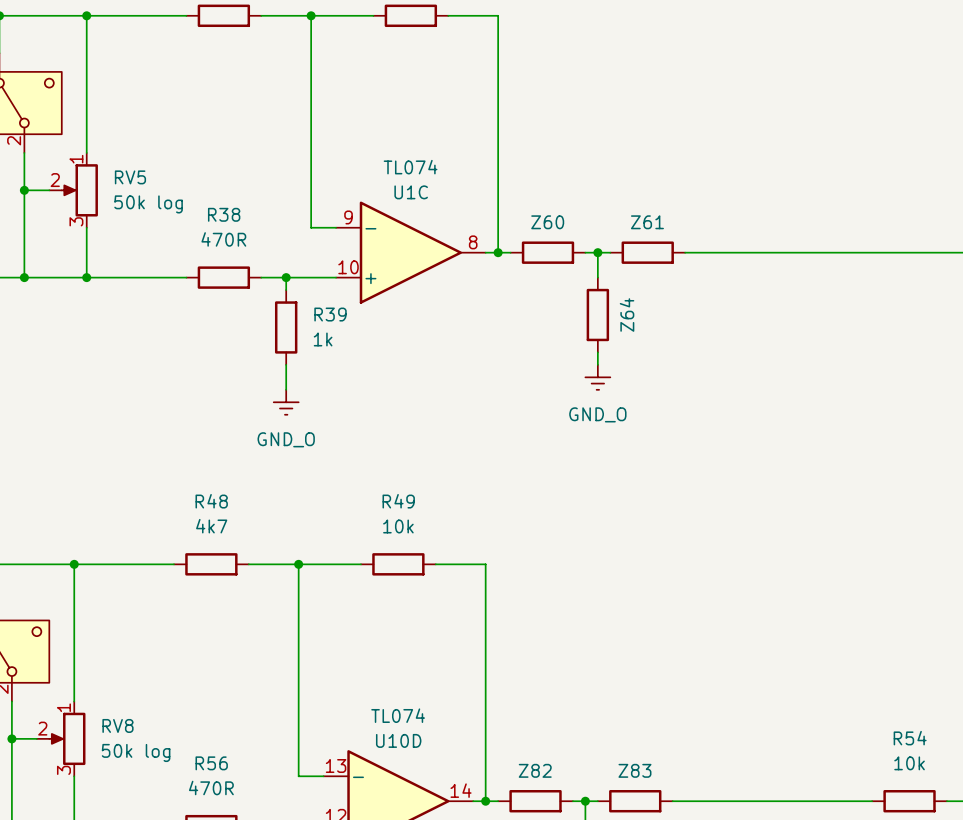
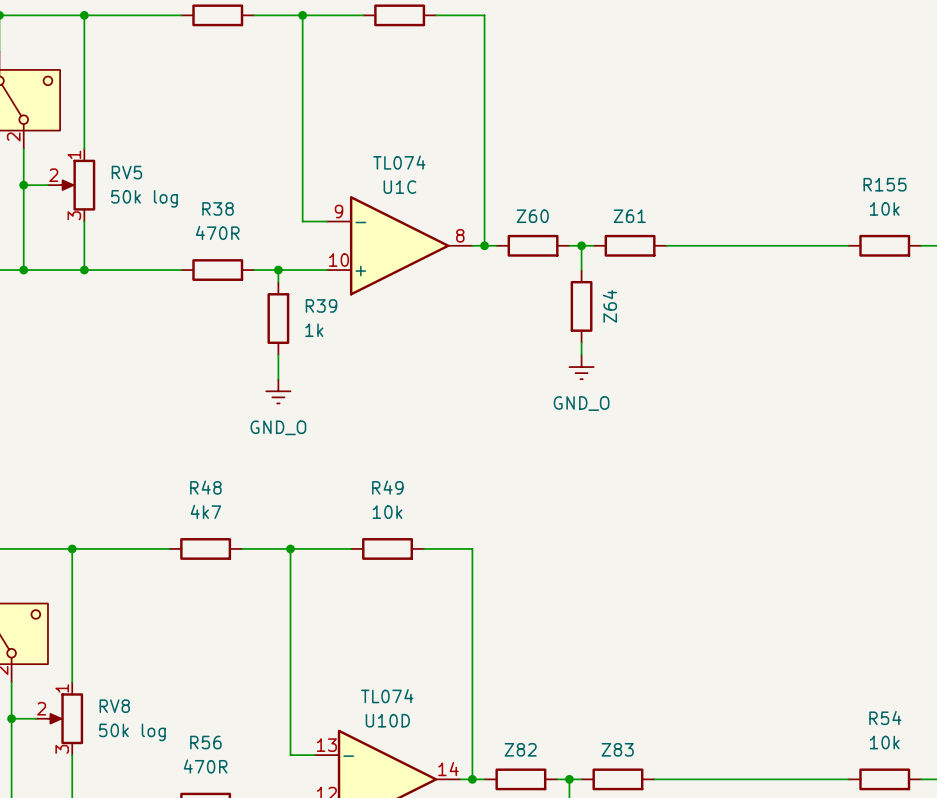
wire: (872, 252) (946, 252) -> none
R155: none -> 10k (884, 245)

